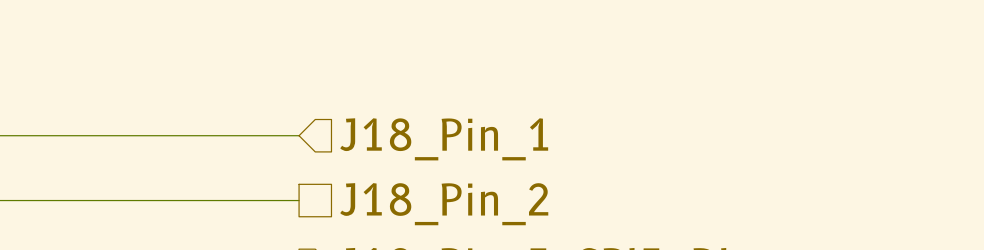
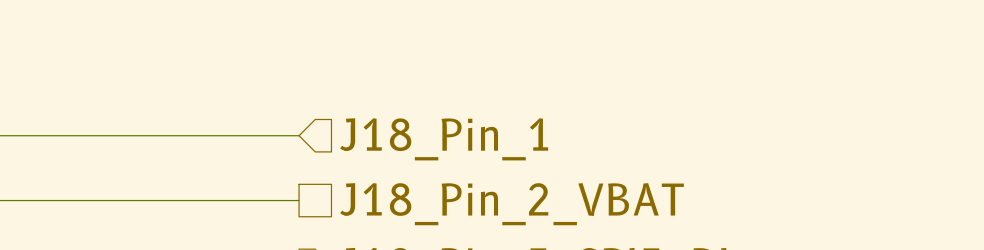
hierarchical label: J18_Pin_2 (444, 204) -> J18_Pin_2_VBAT (512, 204)

